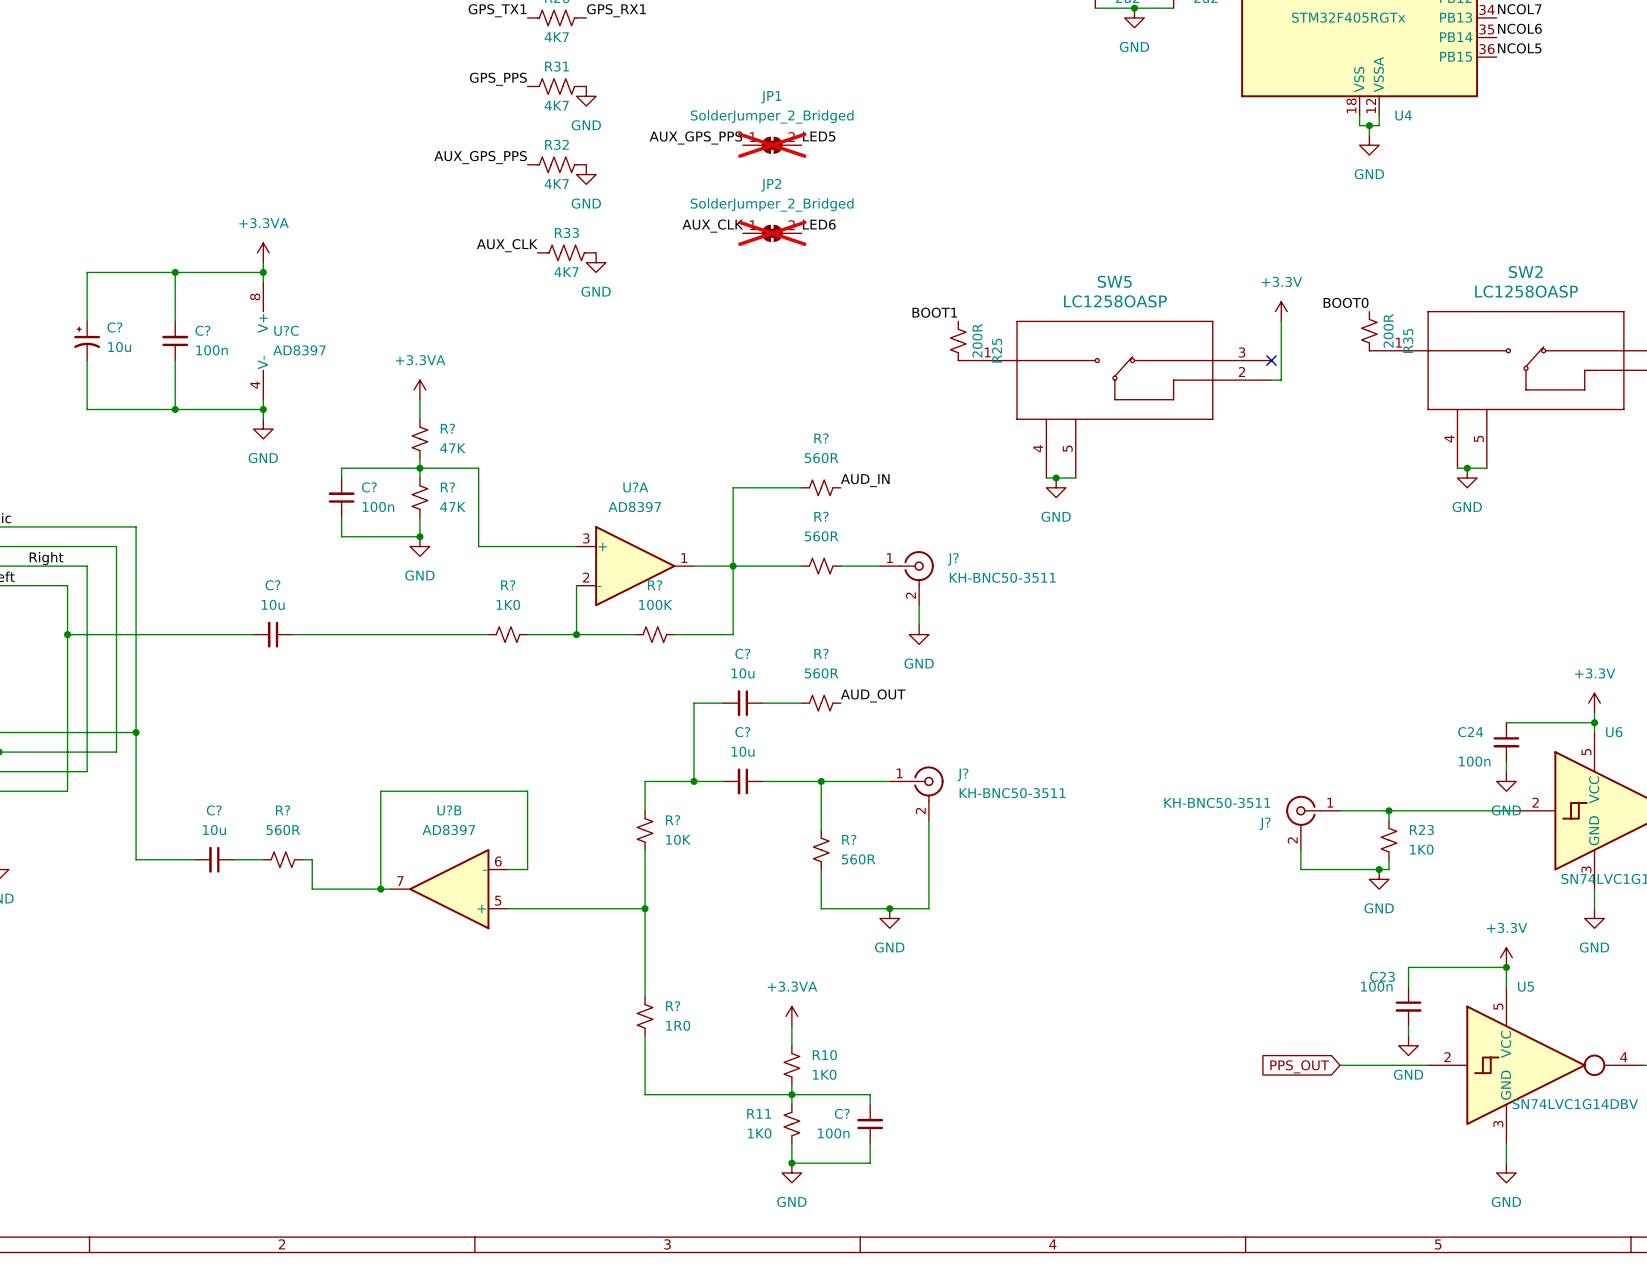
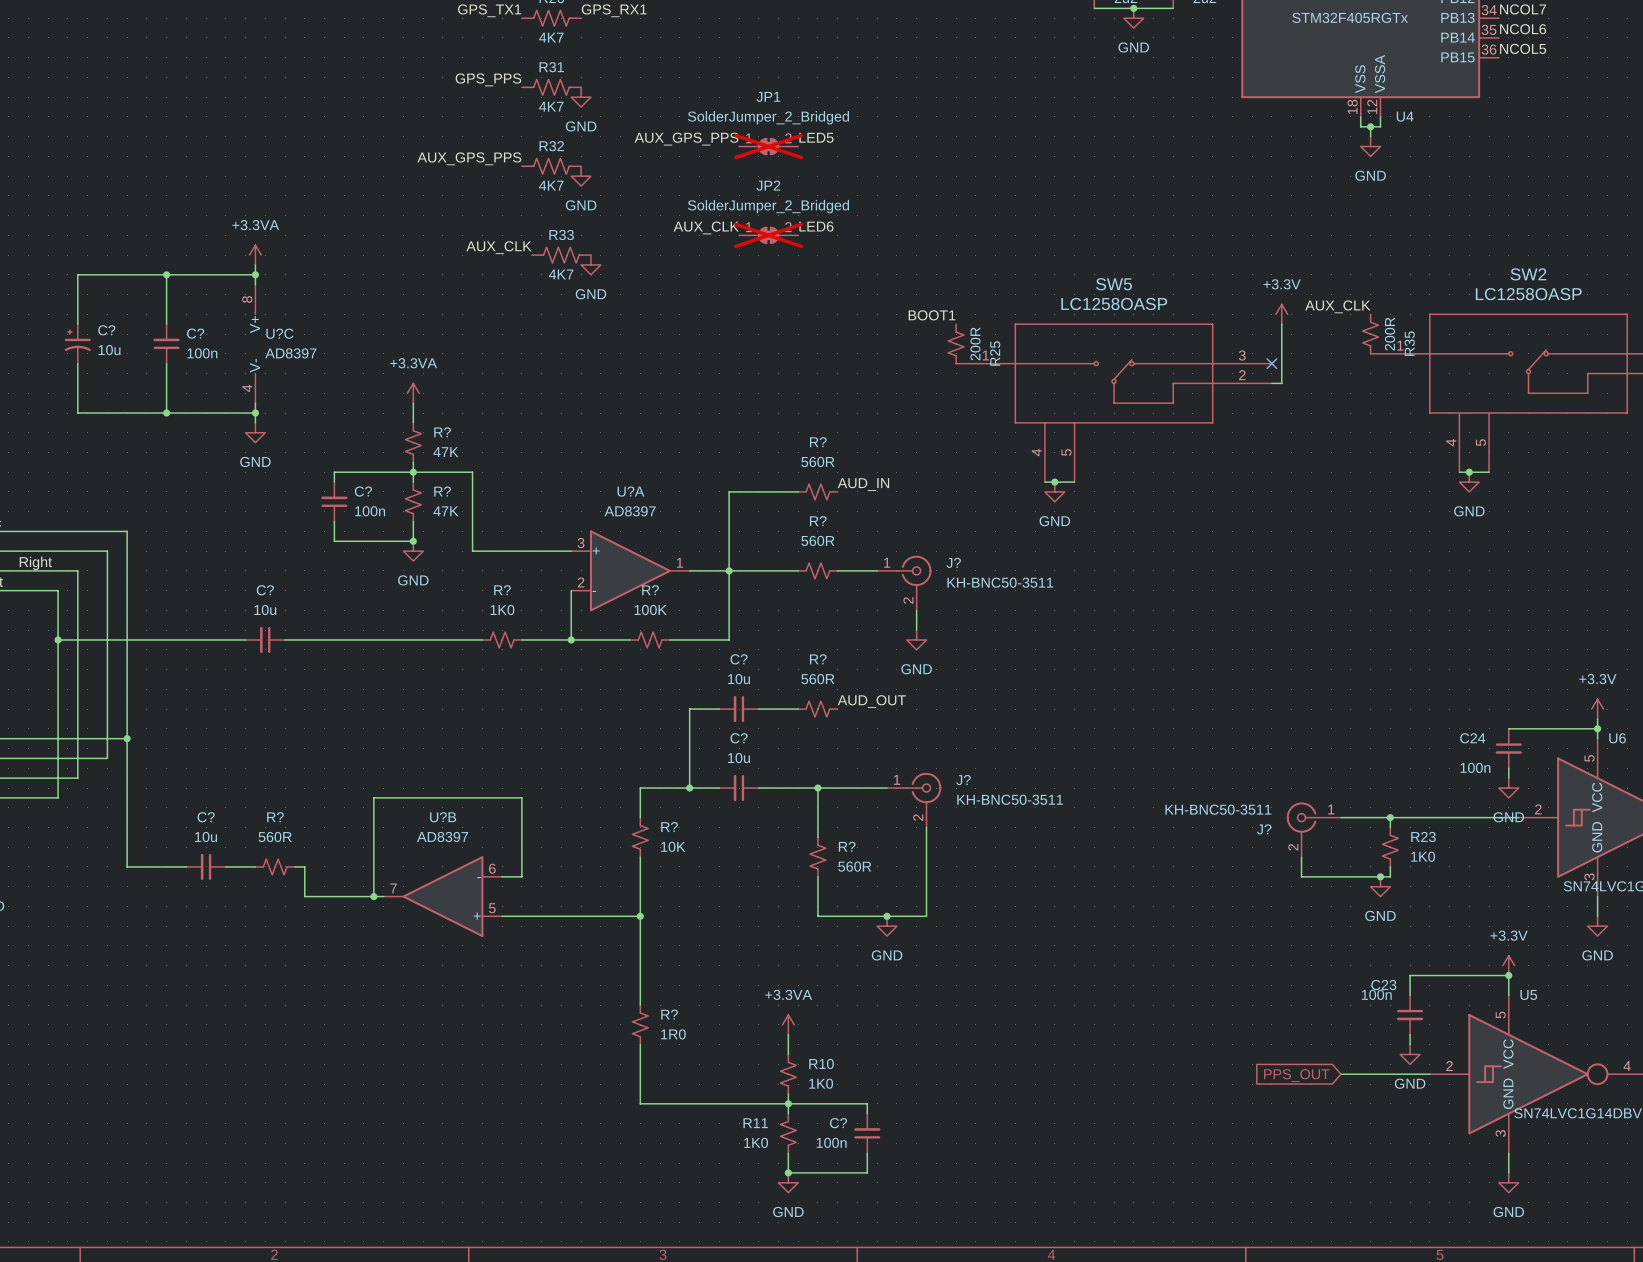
label: BOOT0 (1346, 302) -> AUX_CLK (1337, 306)

